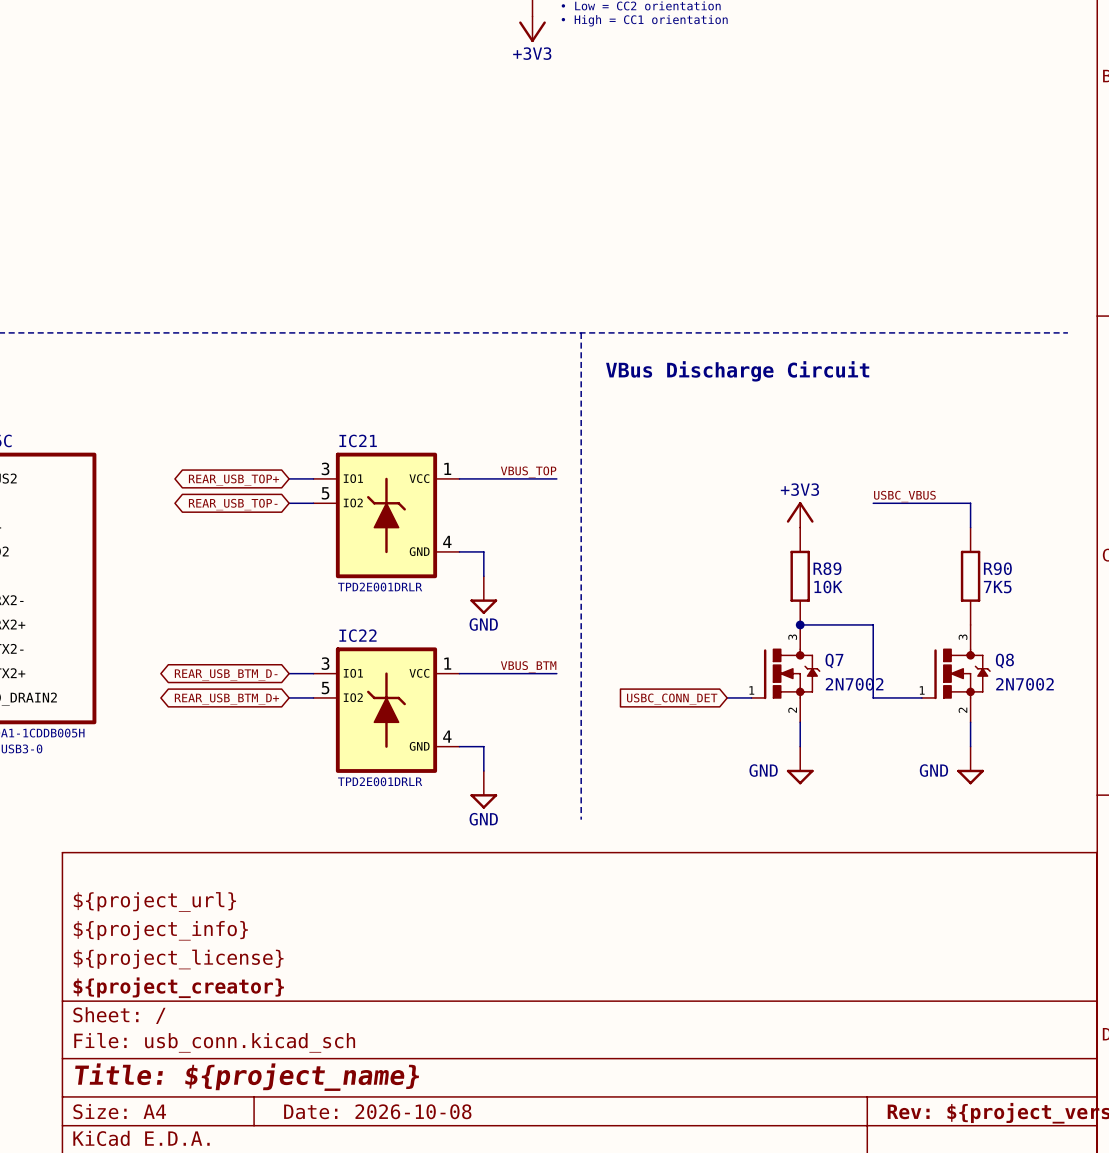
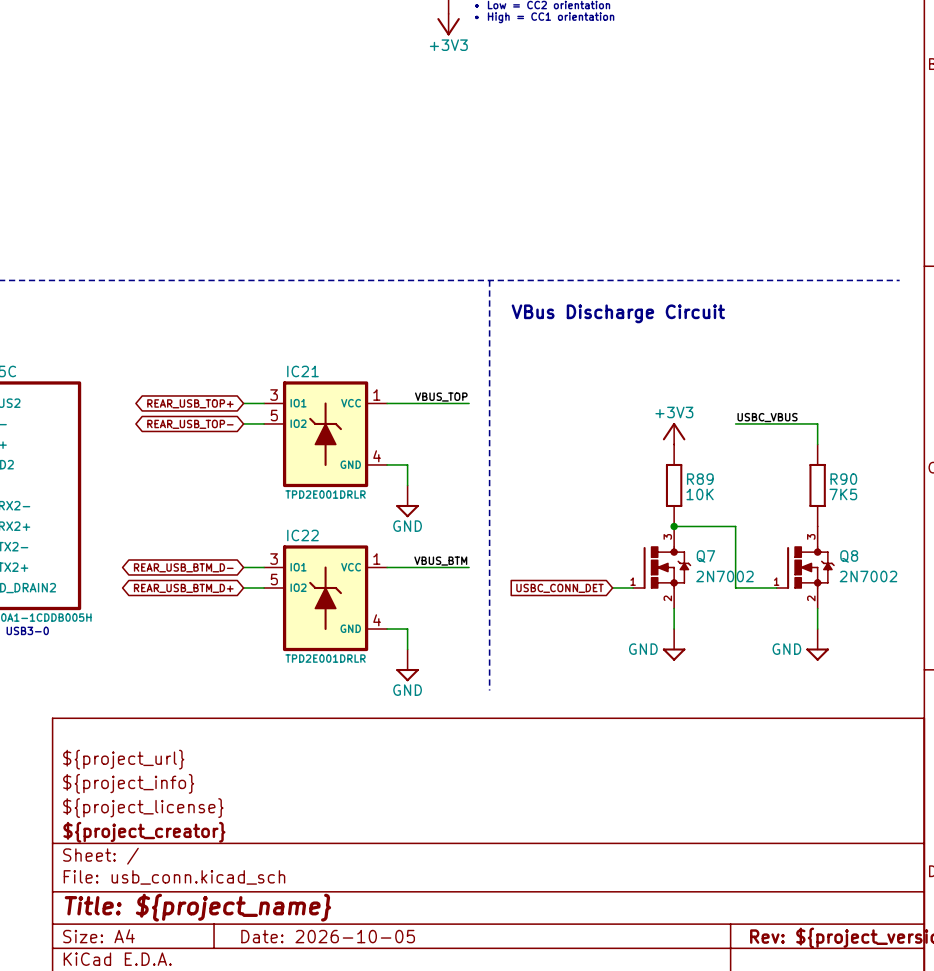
title block: Date: 2026-10-08 (377, 1111) -> Date: 2026-10-05 (328, 936)

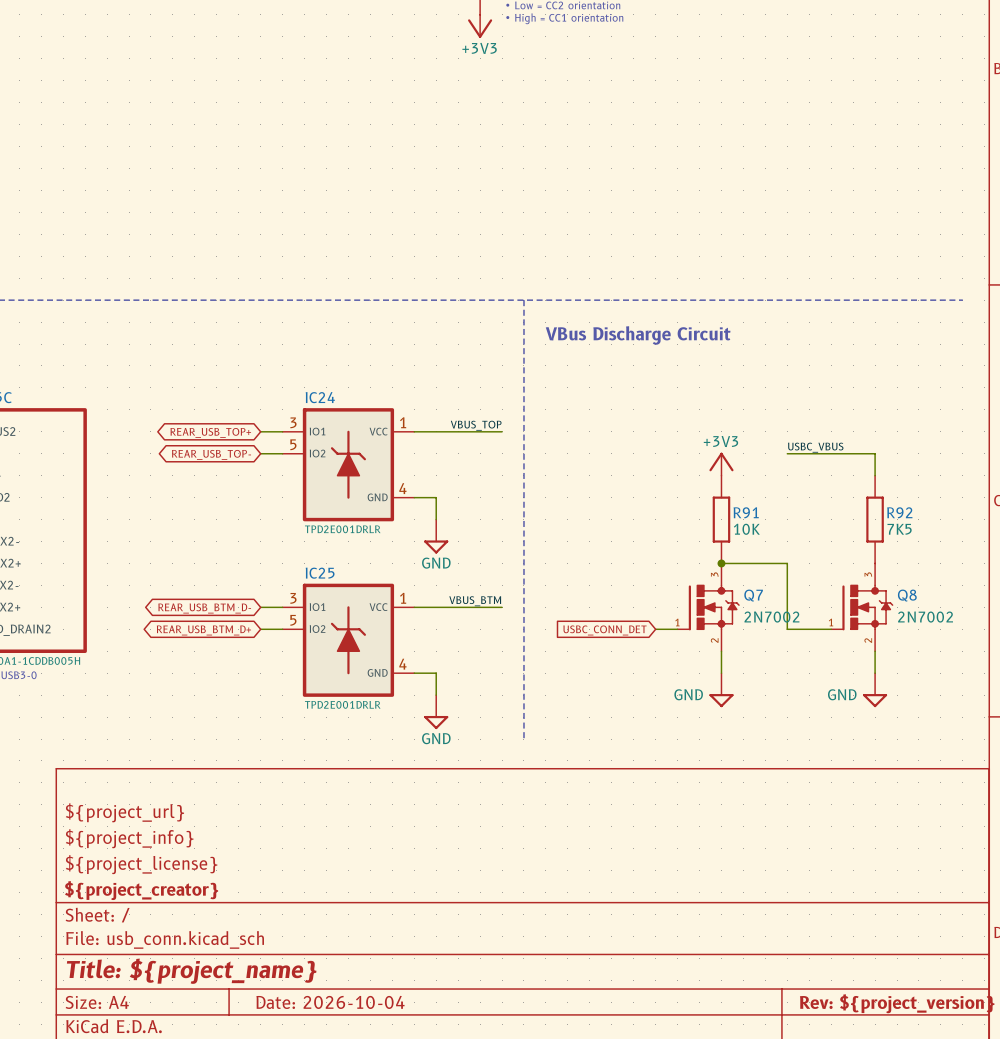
IC21 name: IC21 (302, 371) -> IC24 (320, 397)
R89 name: R89 (700, 479) -> R91 (746, 512)
R90 name: R90 (843, 479) -> R92 (899, 512)
IC22 name: IC22 (302, 535) -> IC25 (320, 573)
title block: Date: 2026-10-05 (328, 936) -> Date: 2026-10-04 (330, 1002)

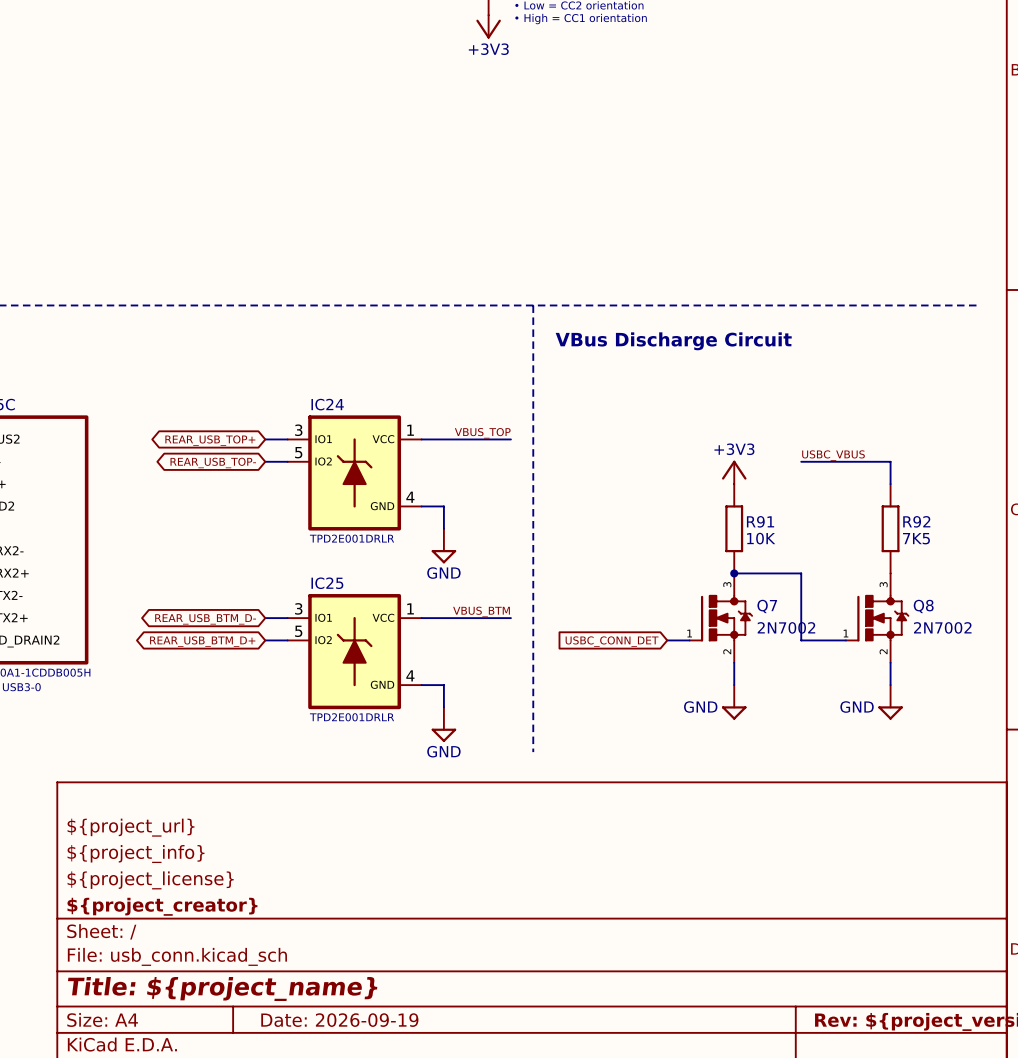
title block: Date: 2026-10-04 (330, 1002) -> Date: 2026-09-19 (339, 1020)

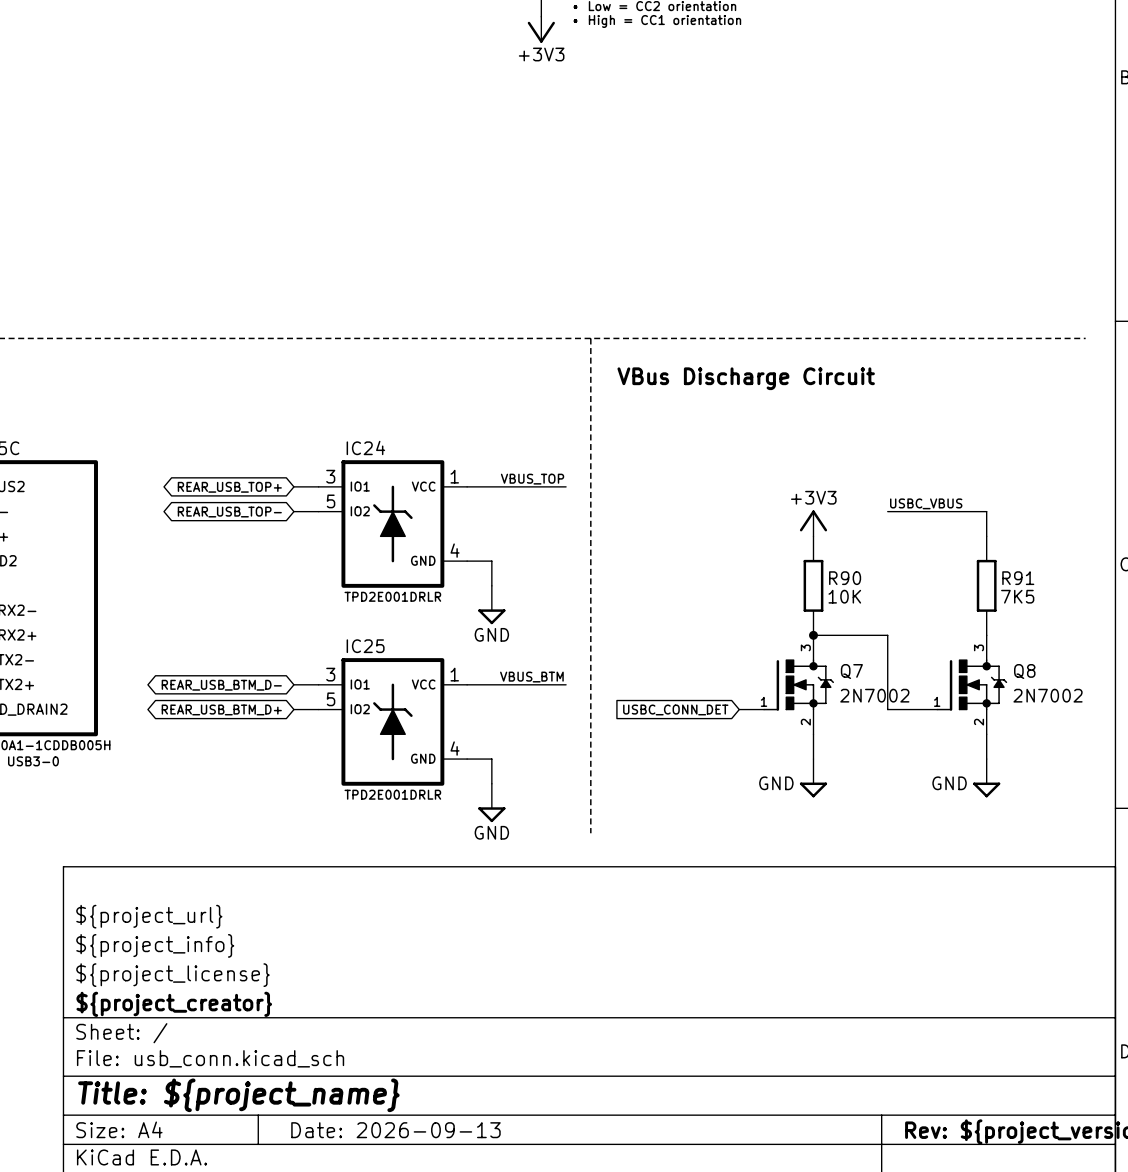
R91 name: R91 (760, 521) -> R90 (845, 578)
R92 name: R92 (916, 521) -> R91 (1018, 578)
title block: Date: 2026-09-19 (339, 1020) -> Date: 2026-09-13 (395, 1130)

